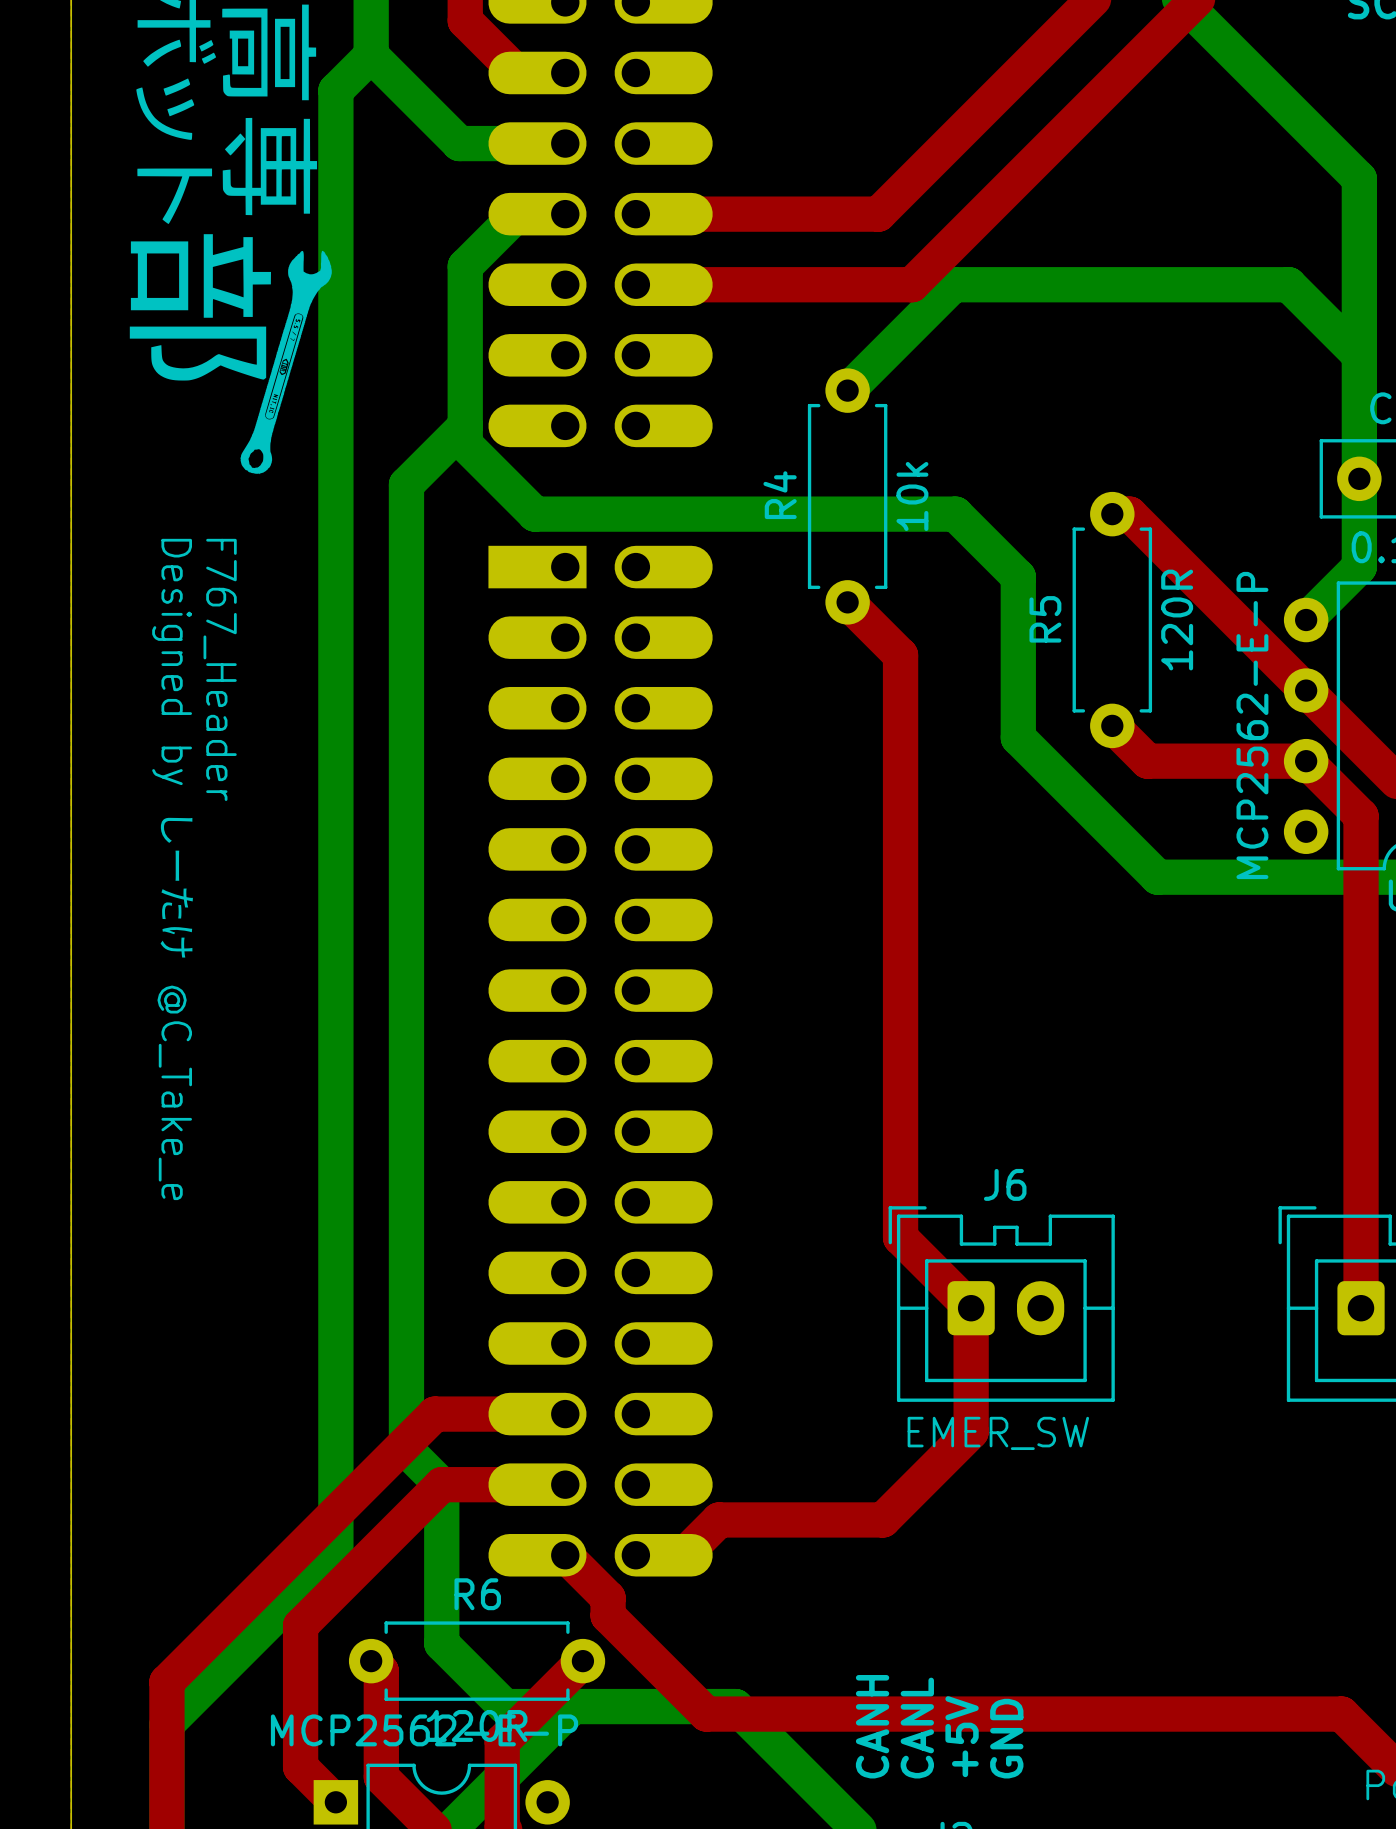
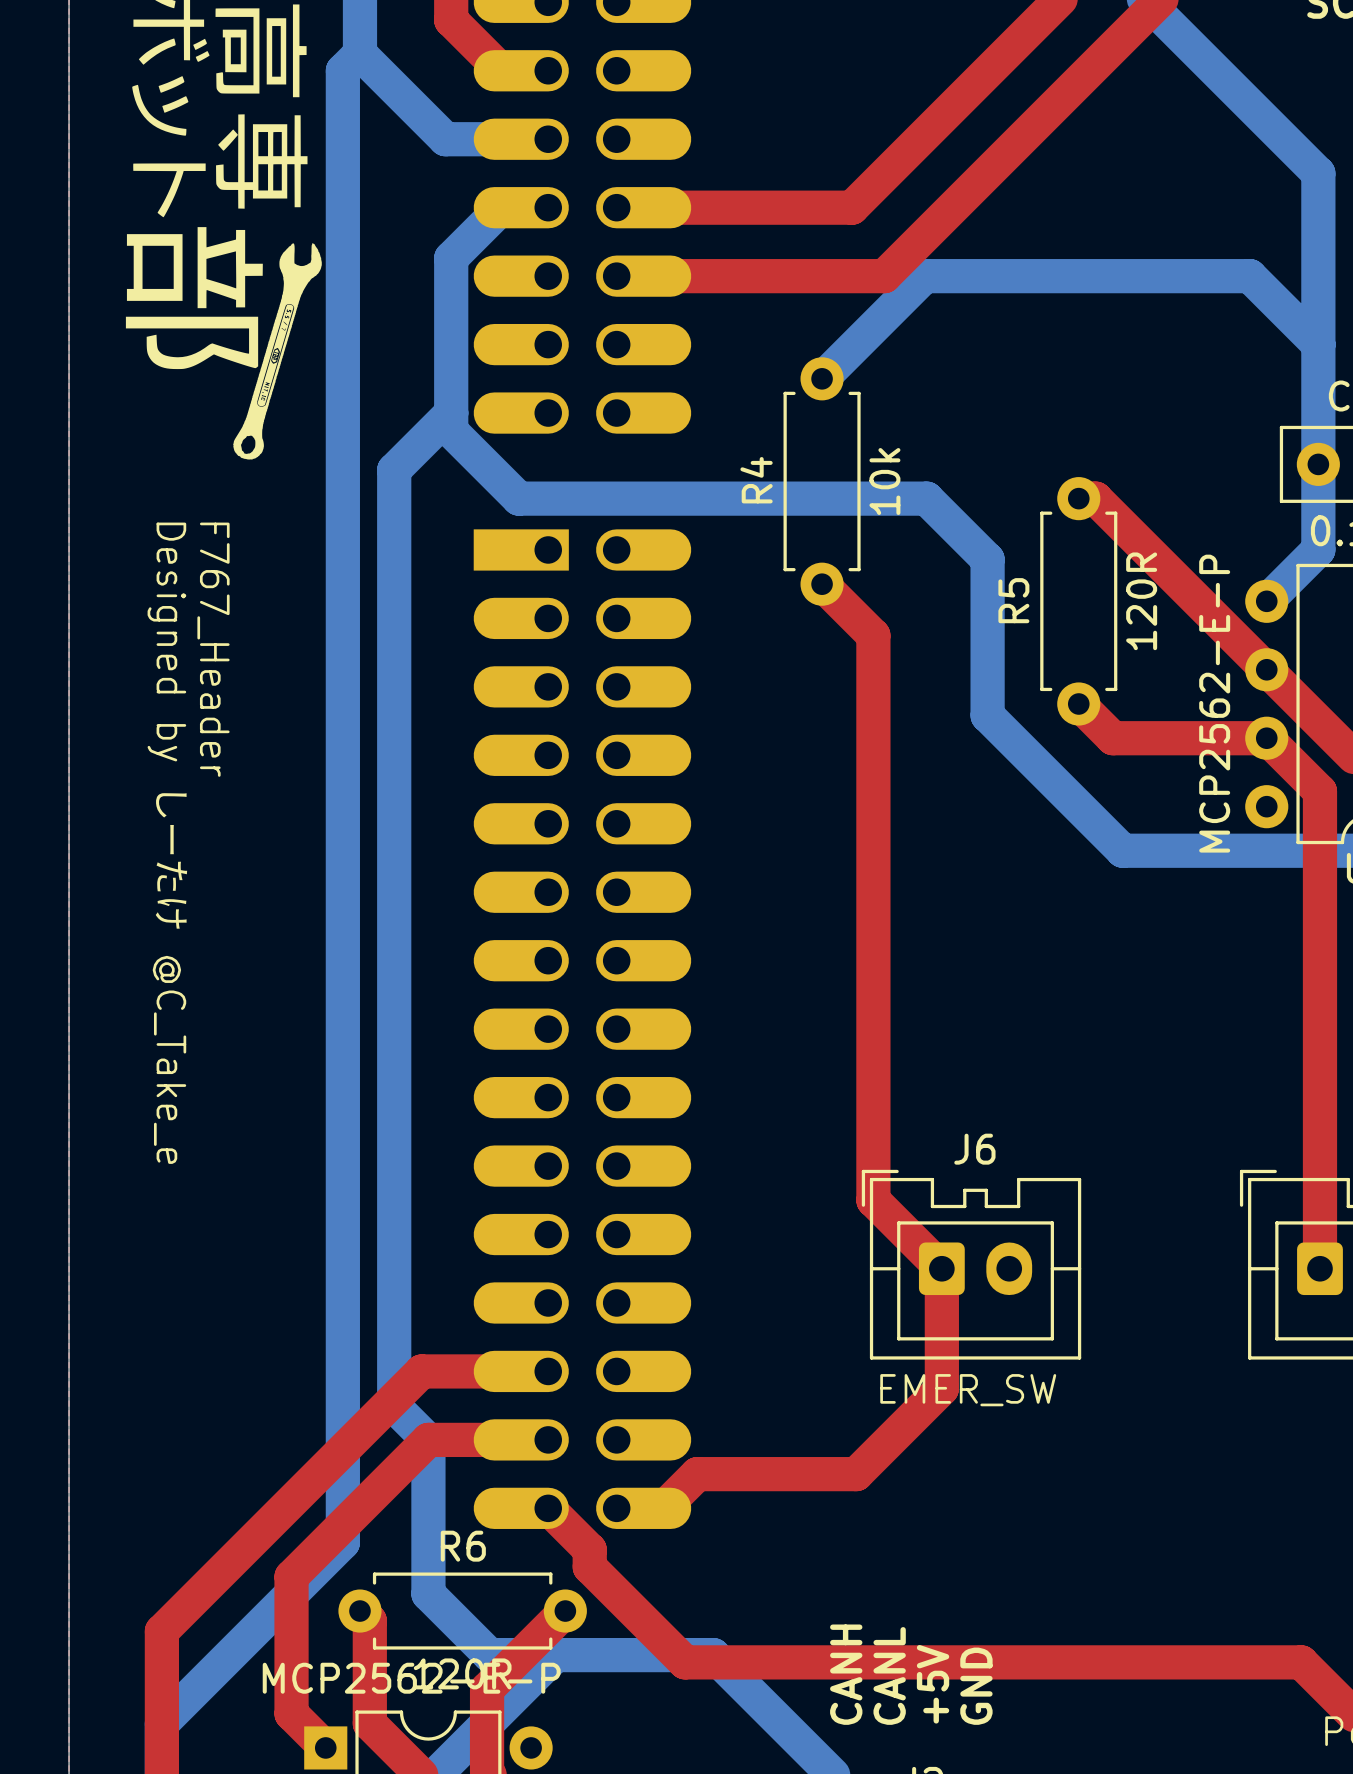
bottom track: (353, 72) (335, 90) (335, 1555) (166, 1724) (166, 1777) -> (342, 70) (342, 1542) (161, 1723)

